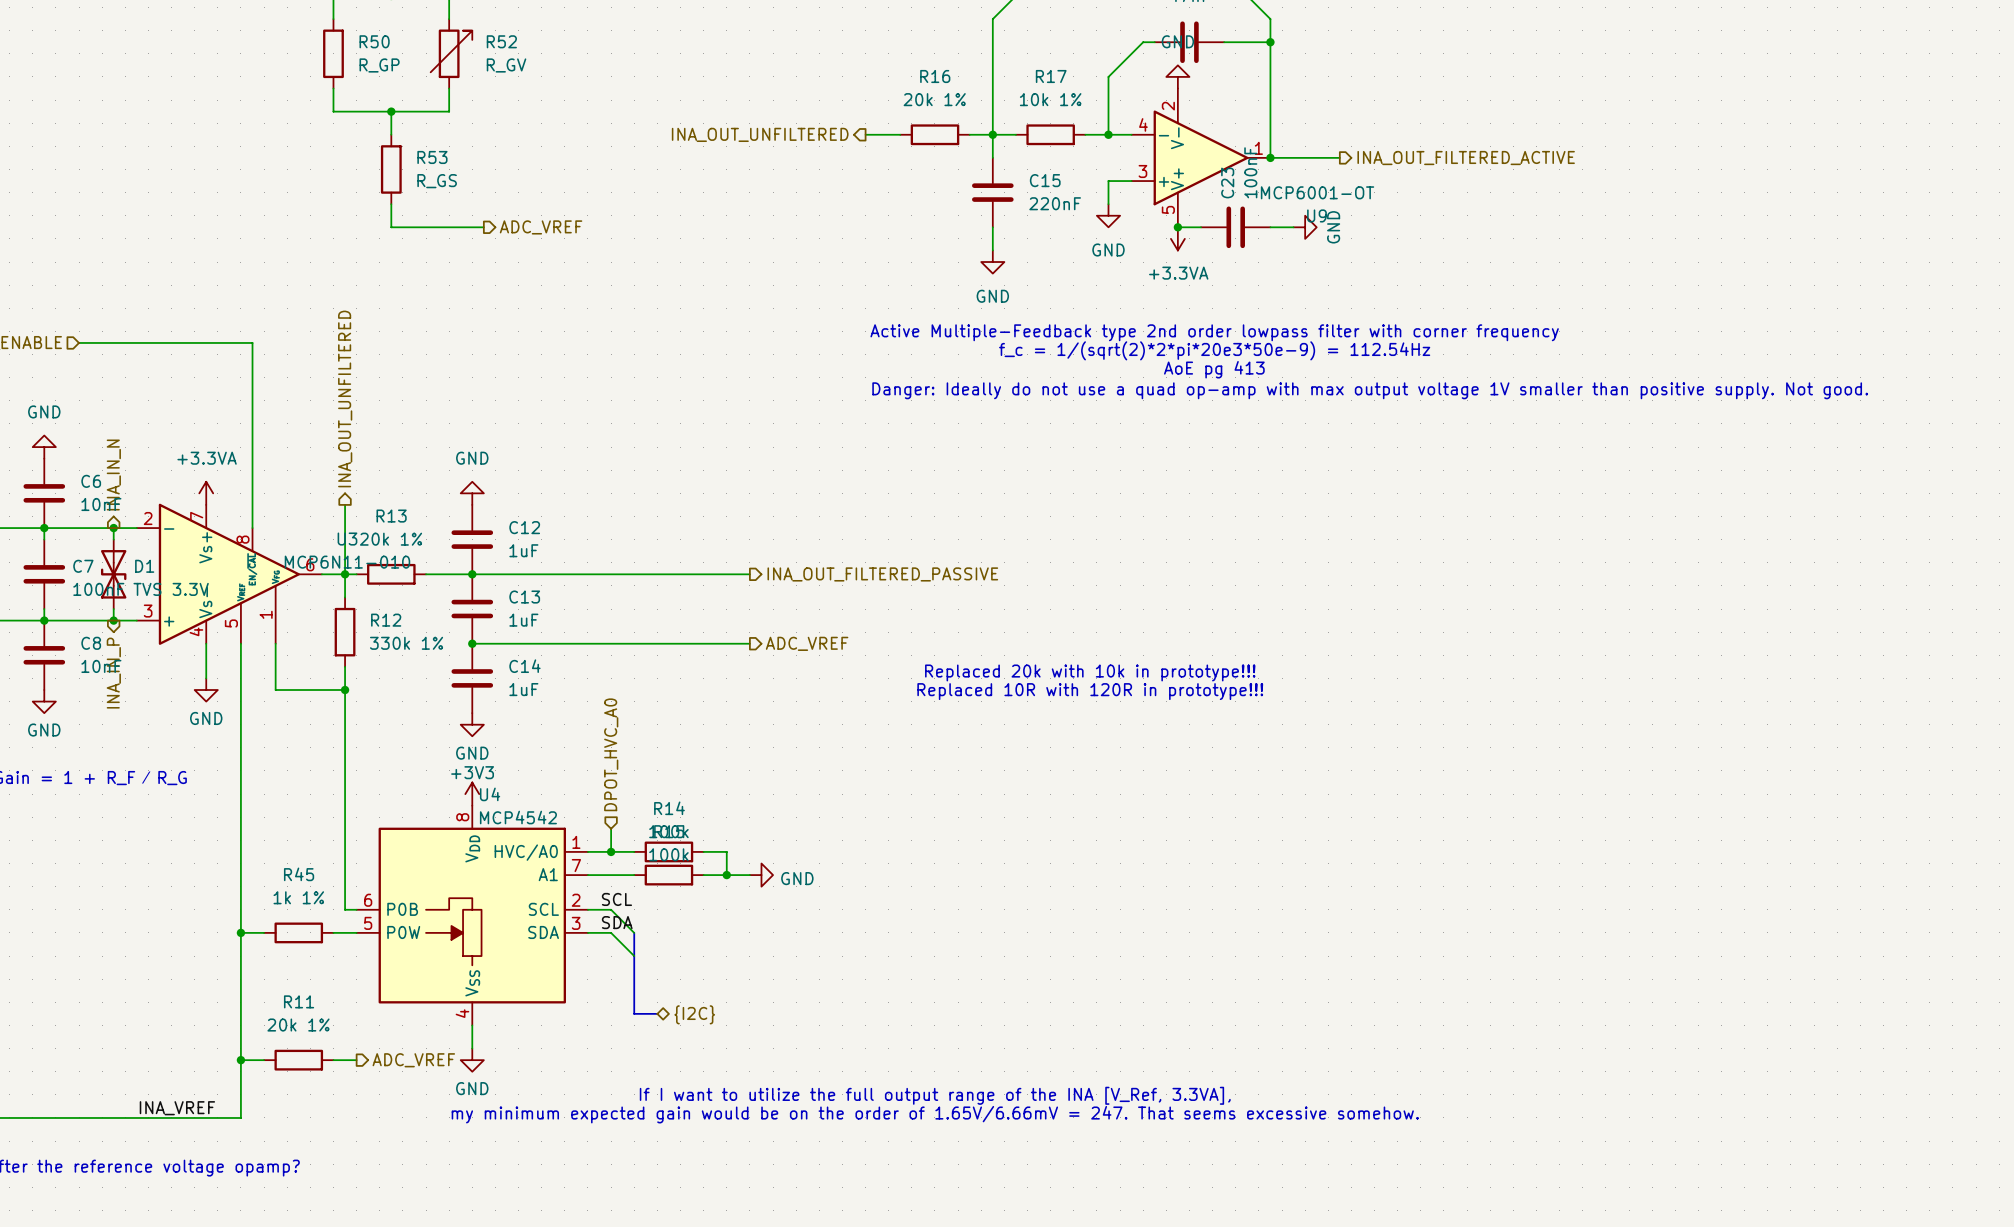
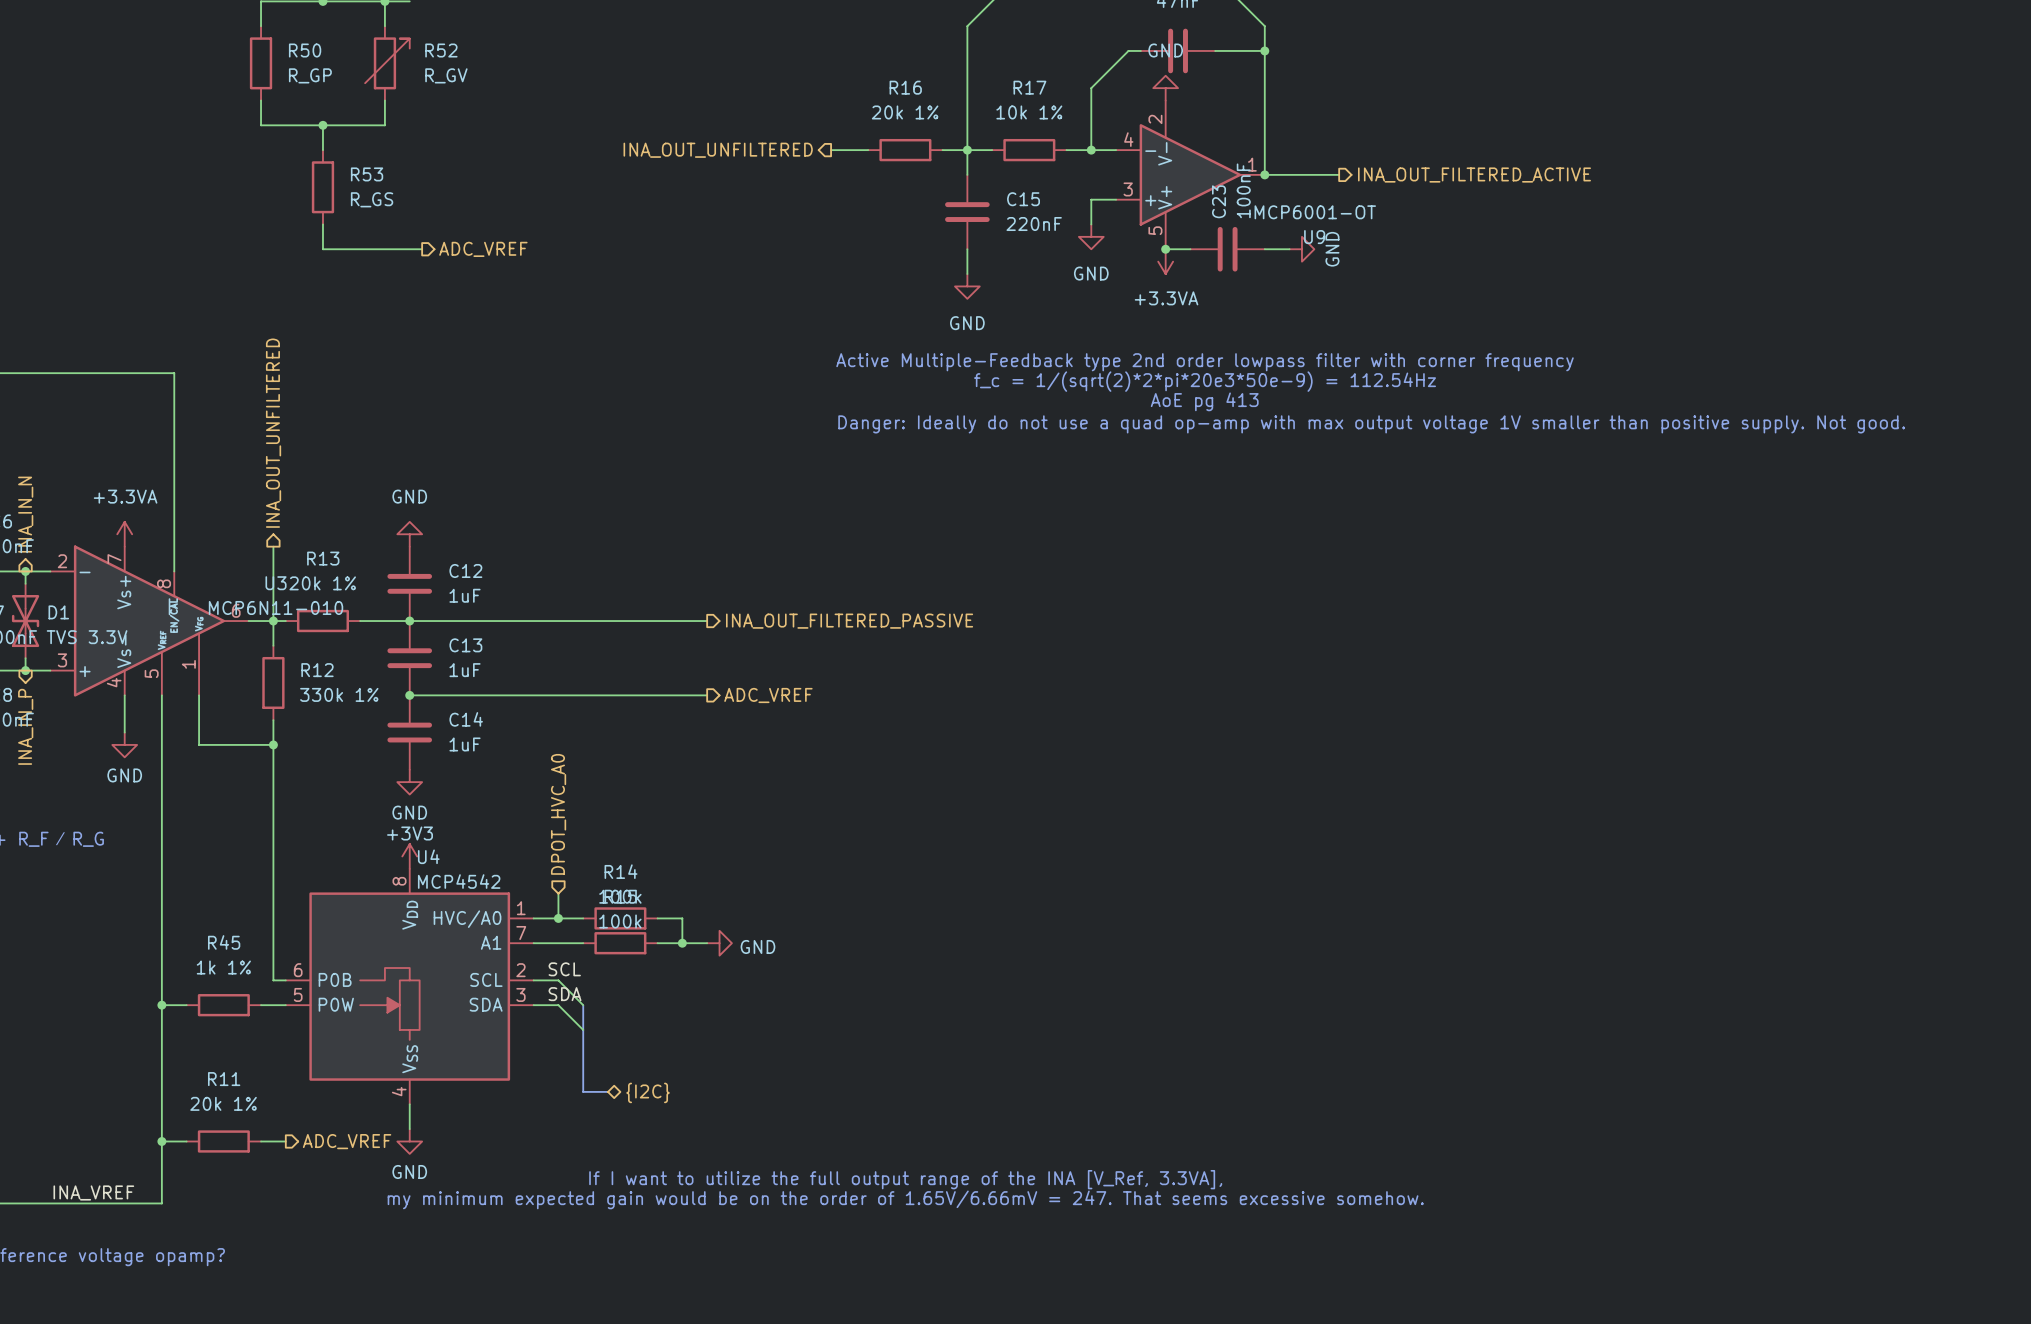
text: Replaced 20k with 10k in prototype!!! (1090, 672) -> none
text: Replaced 10R with 120R in prototype!!! (1090, 691) -> none

